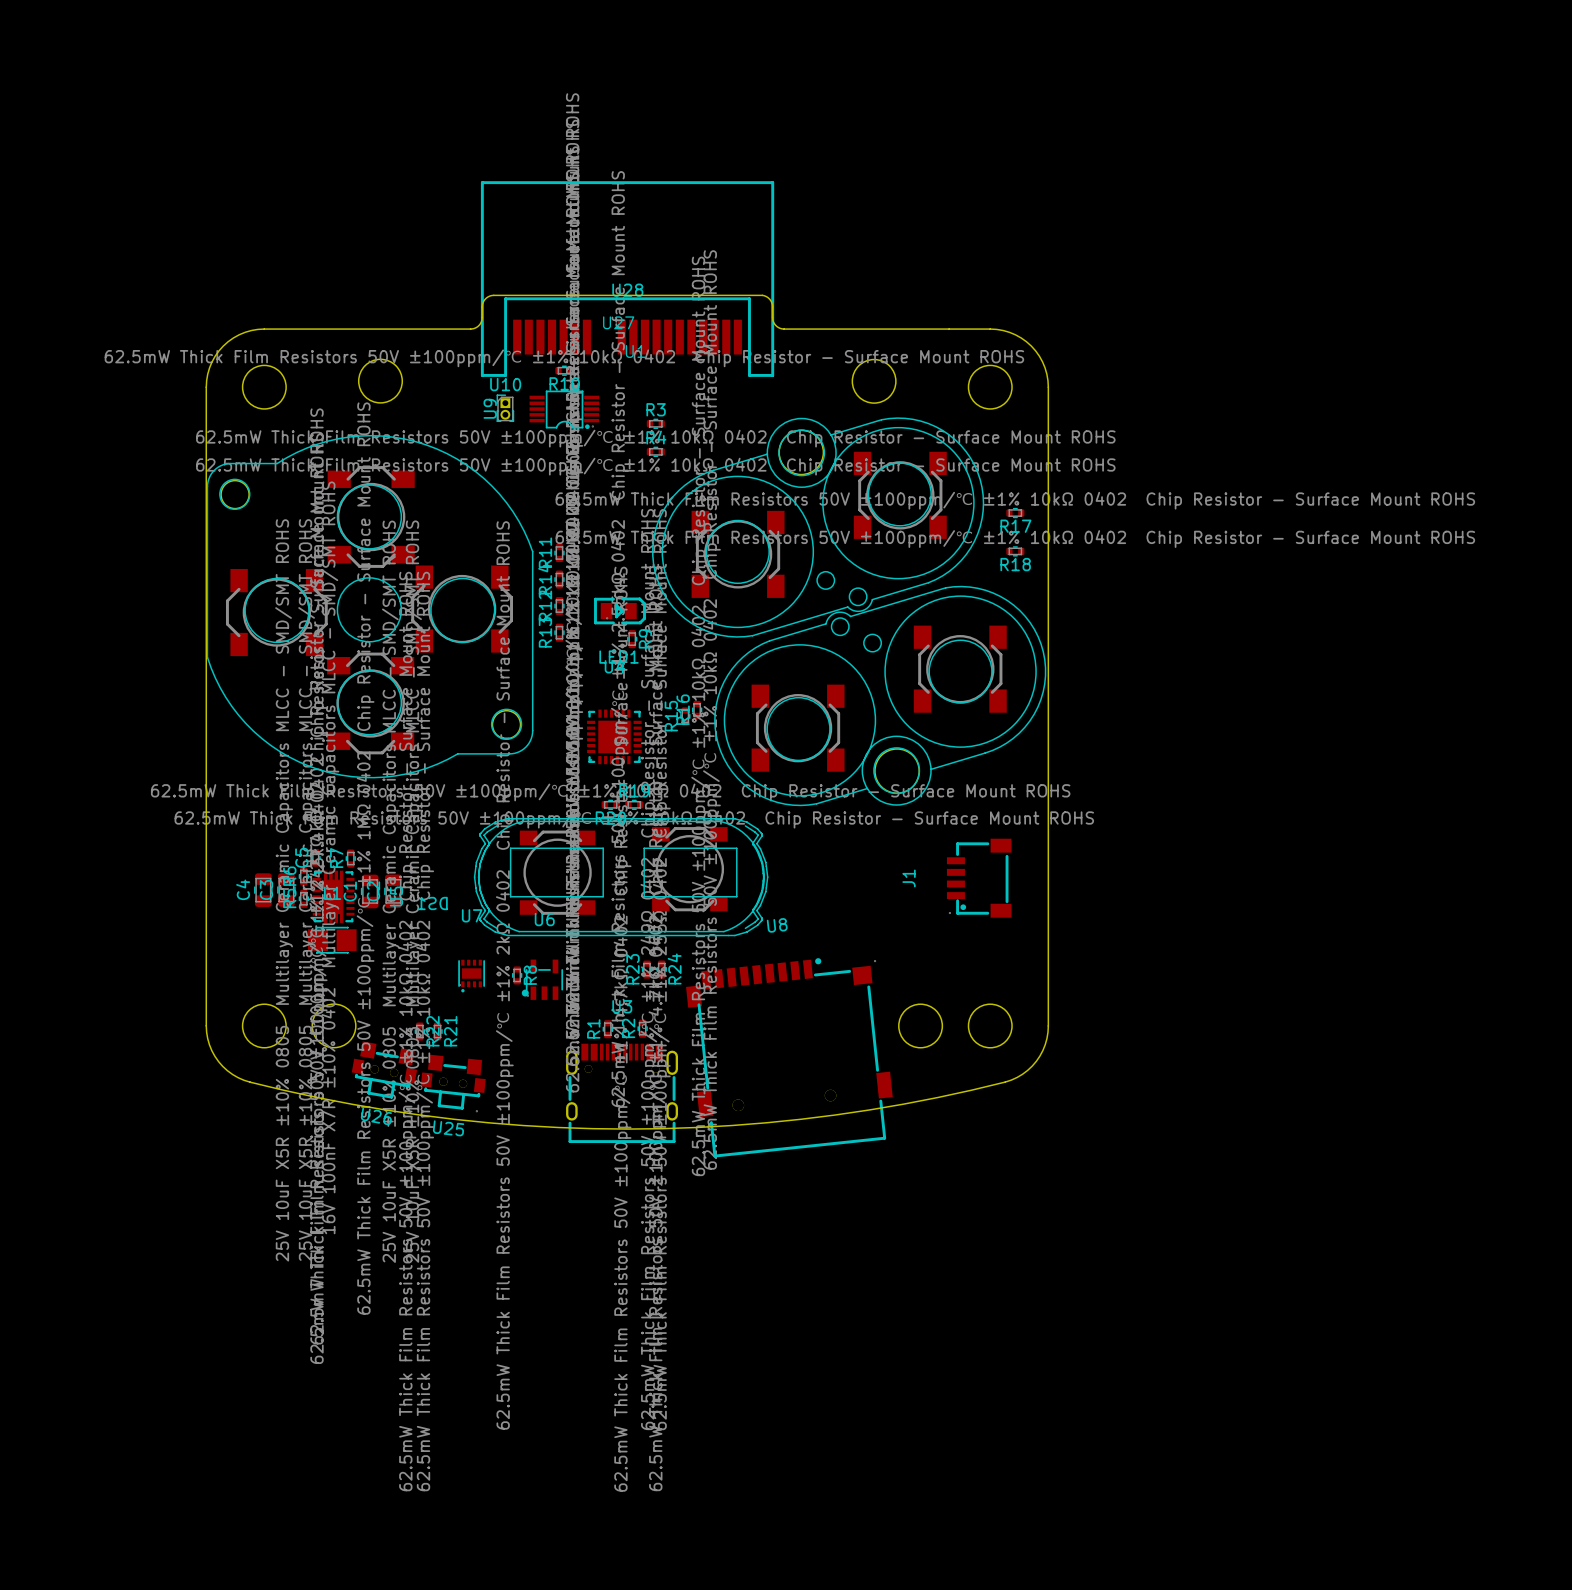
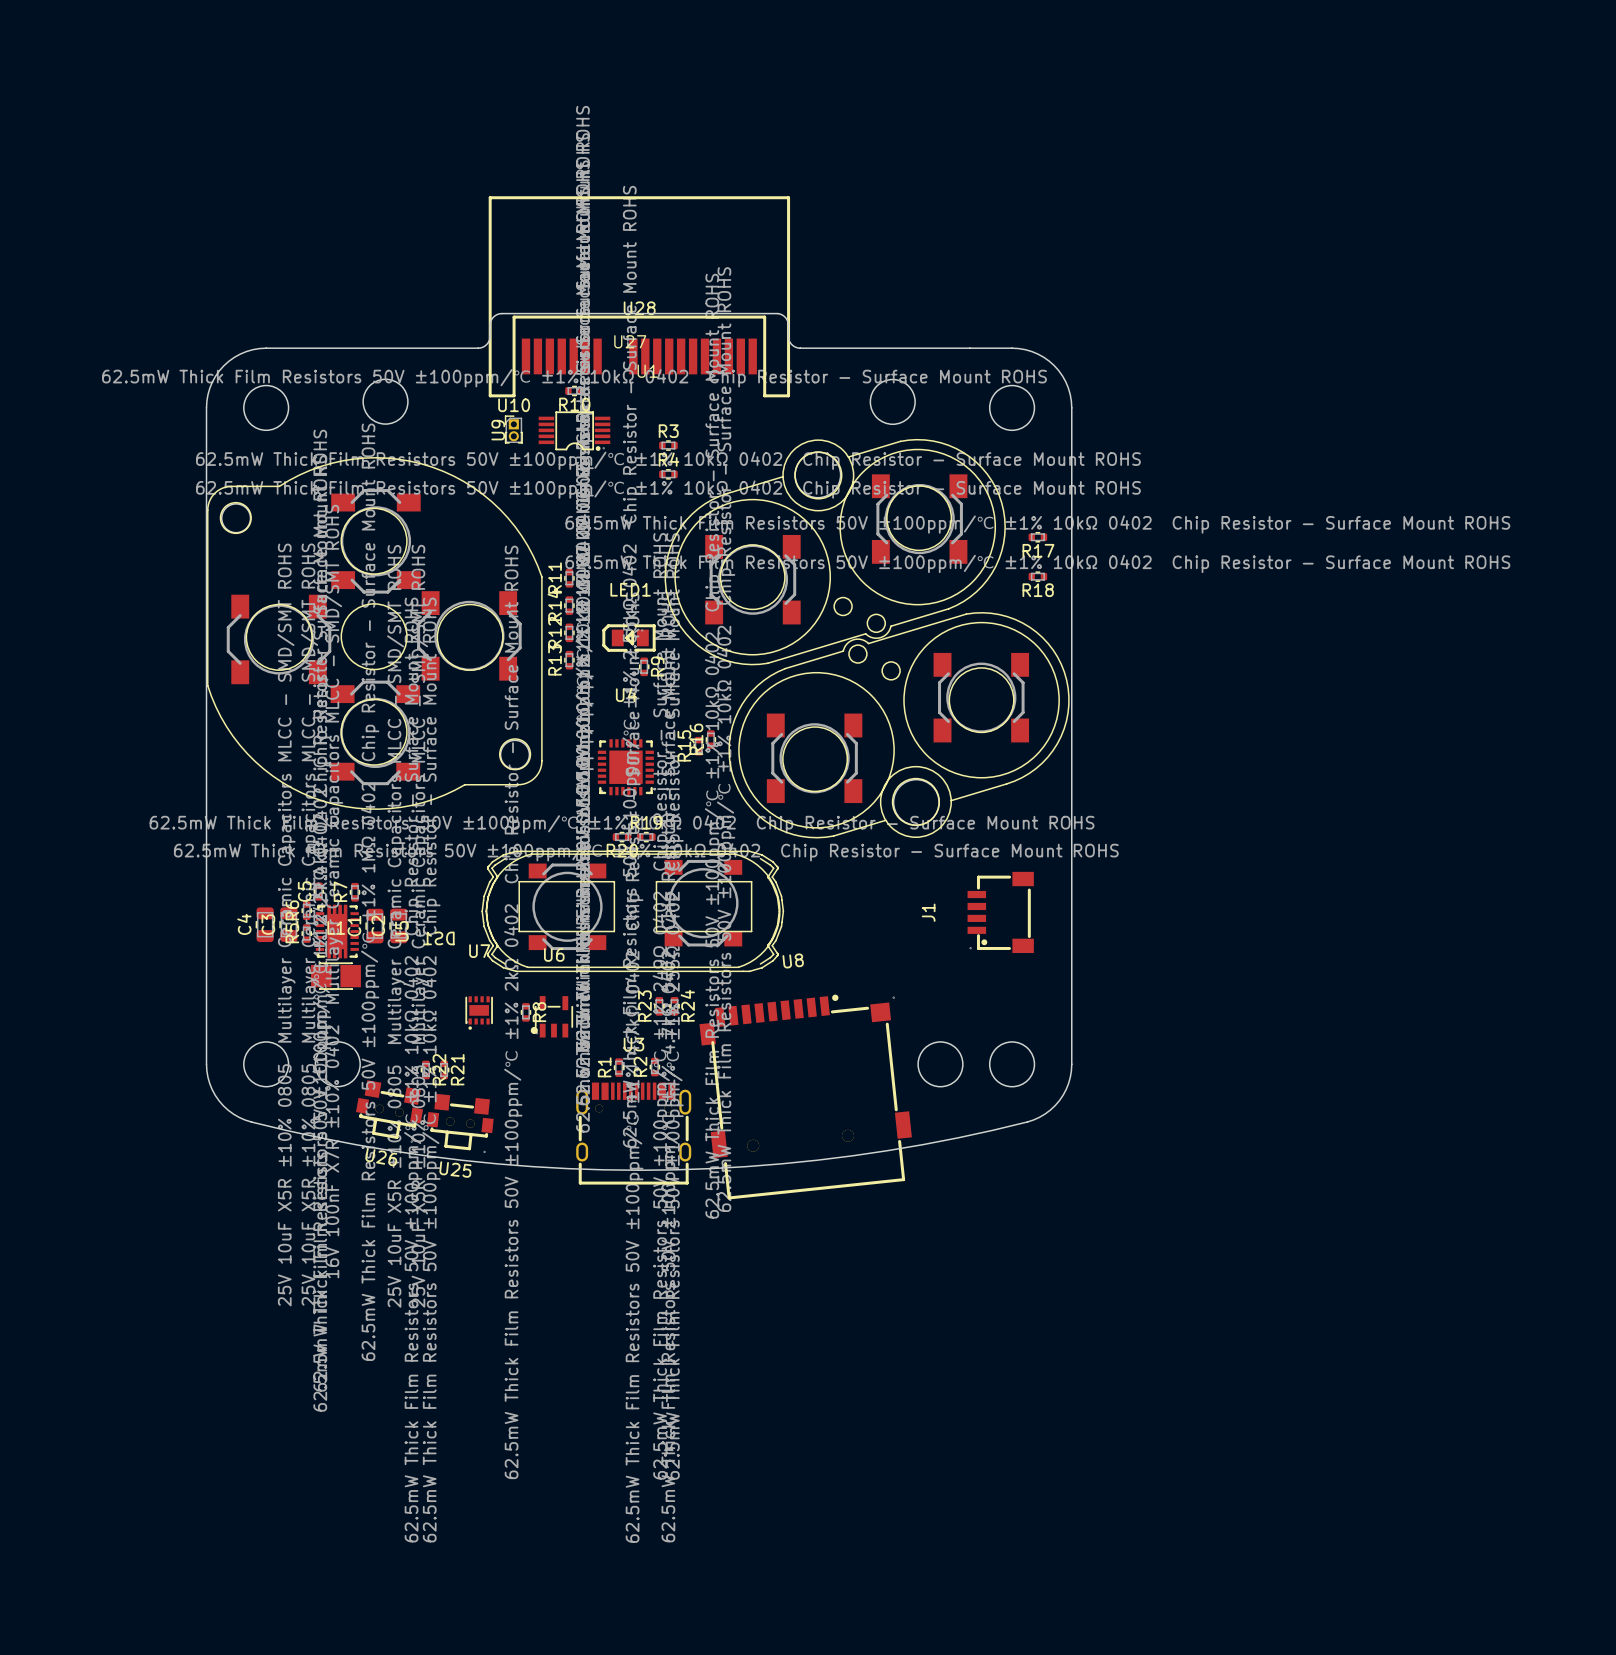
LED1 rotation: 0° (620, 610) -> 180° (629, 638)

